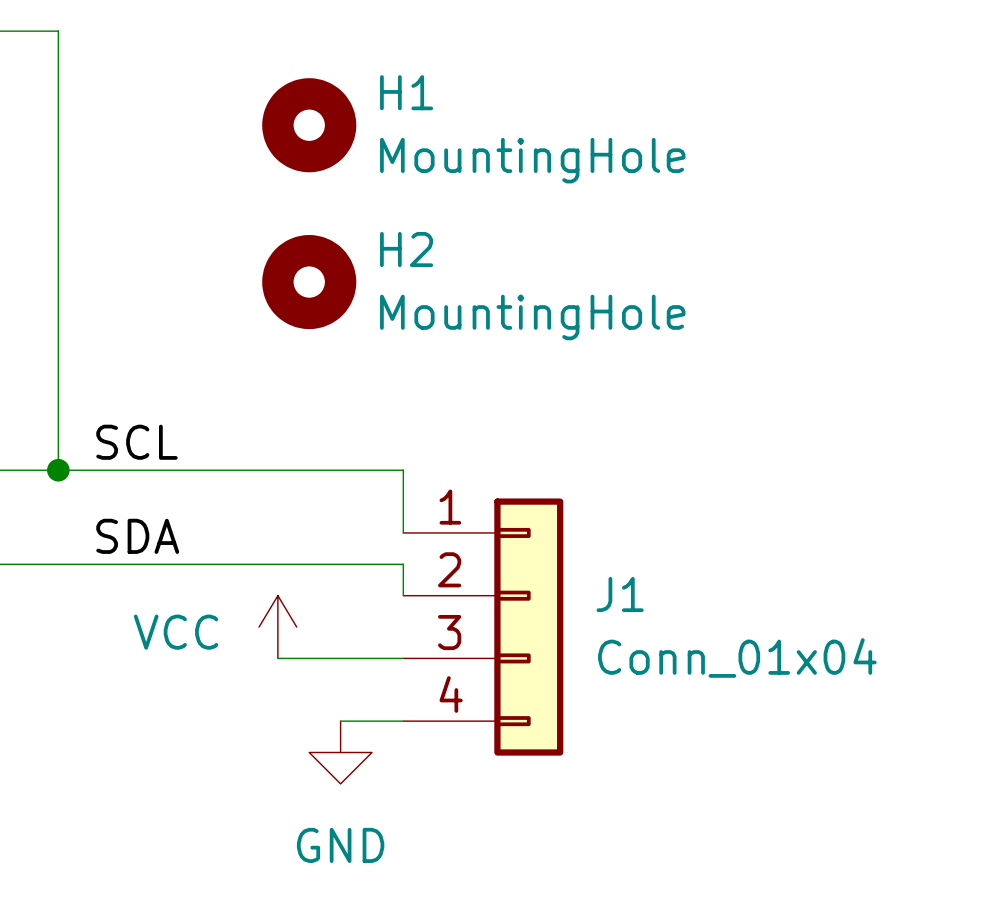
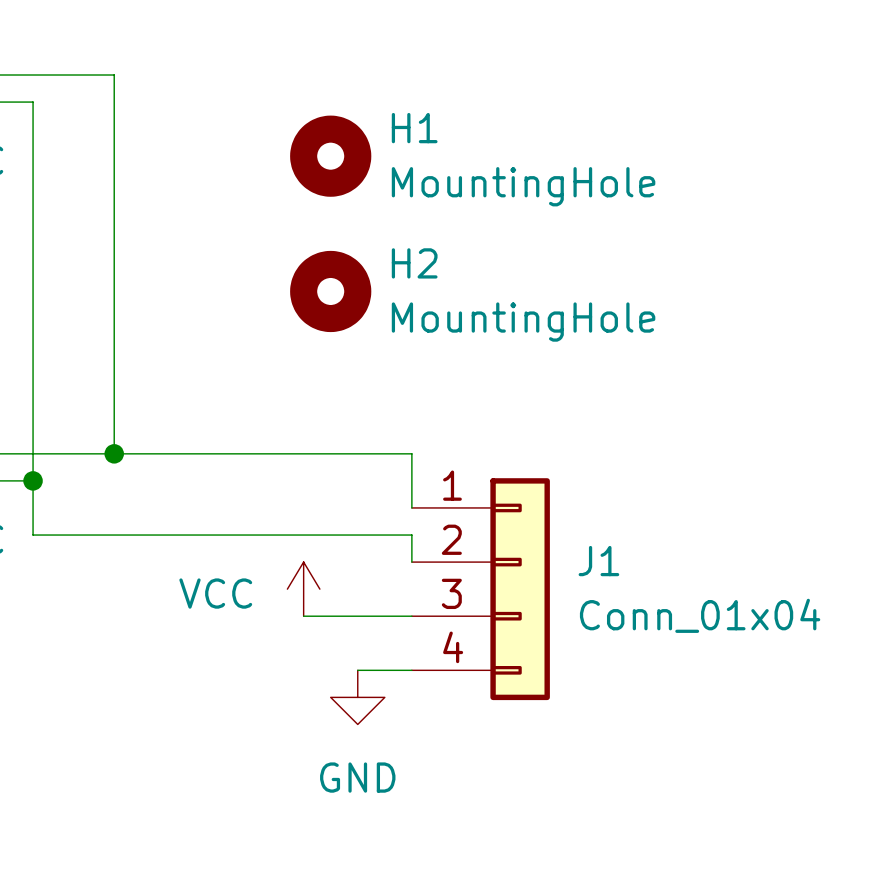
label: SCL (136, 442) -> none
label: SDA (137, 536) -> none

